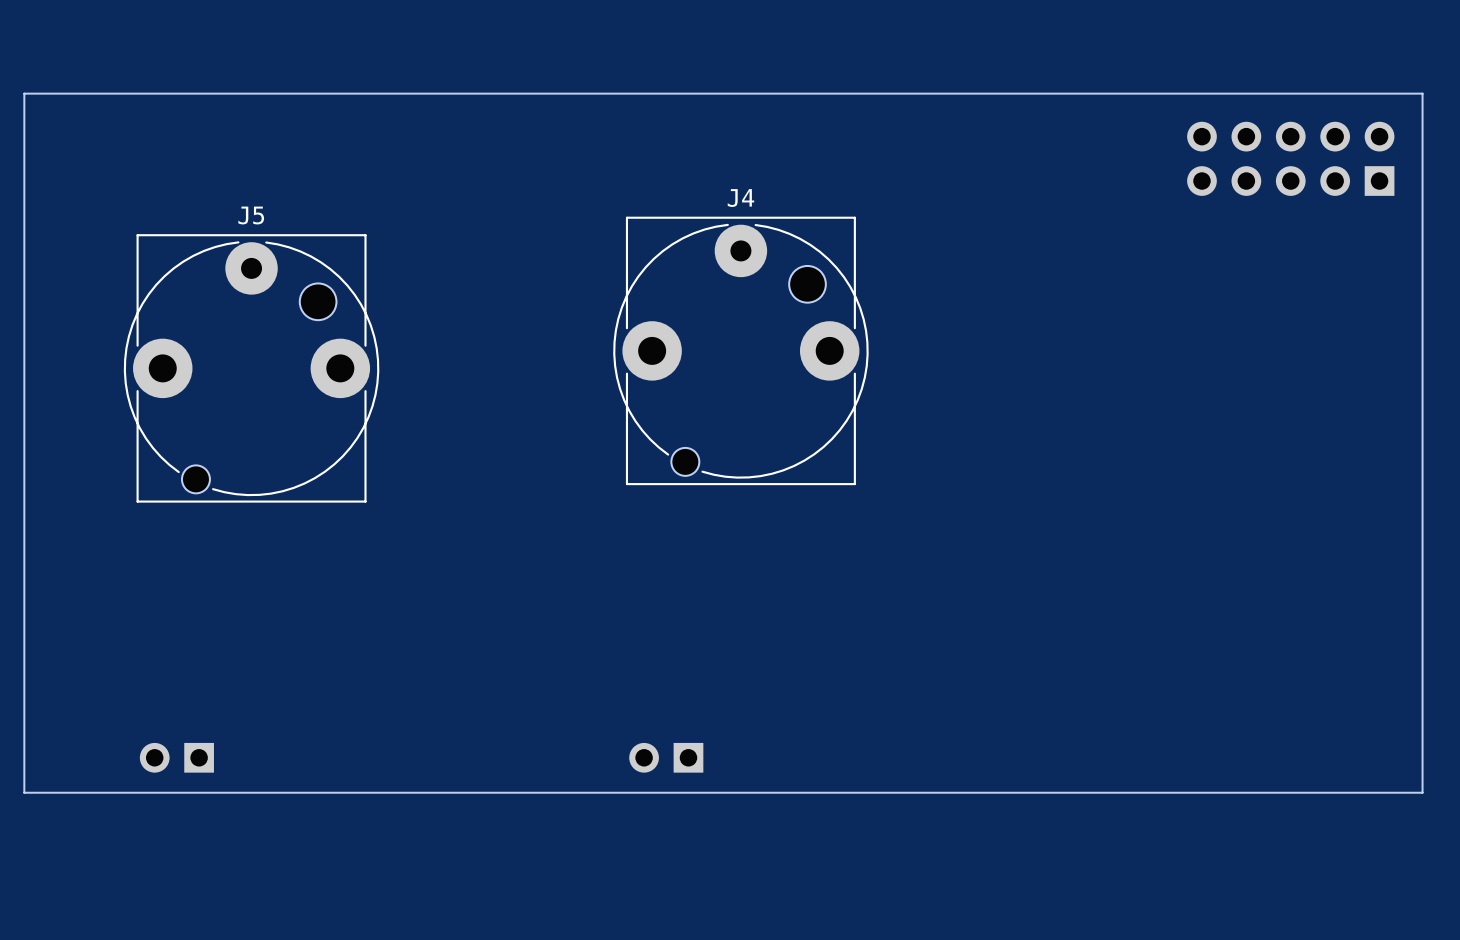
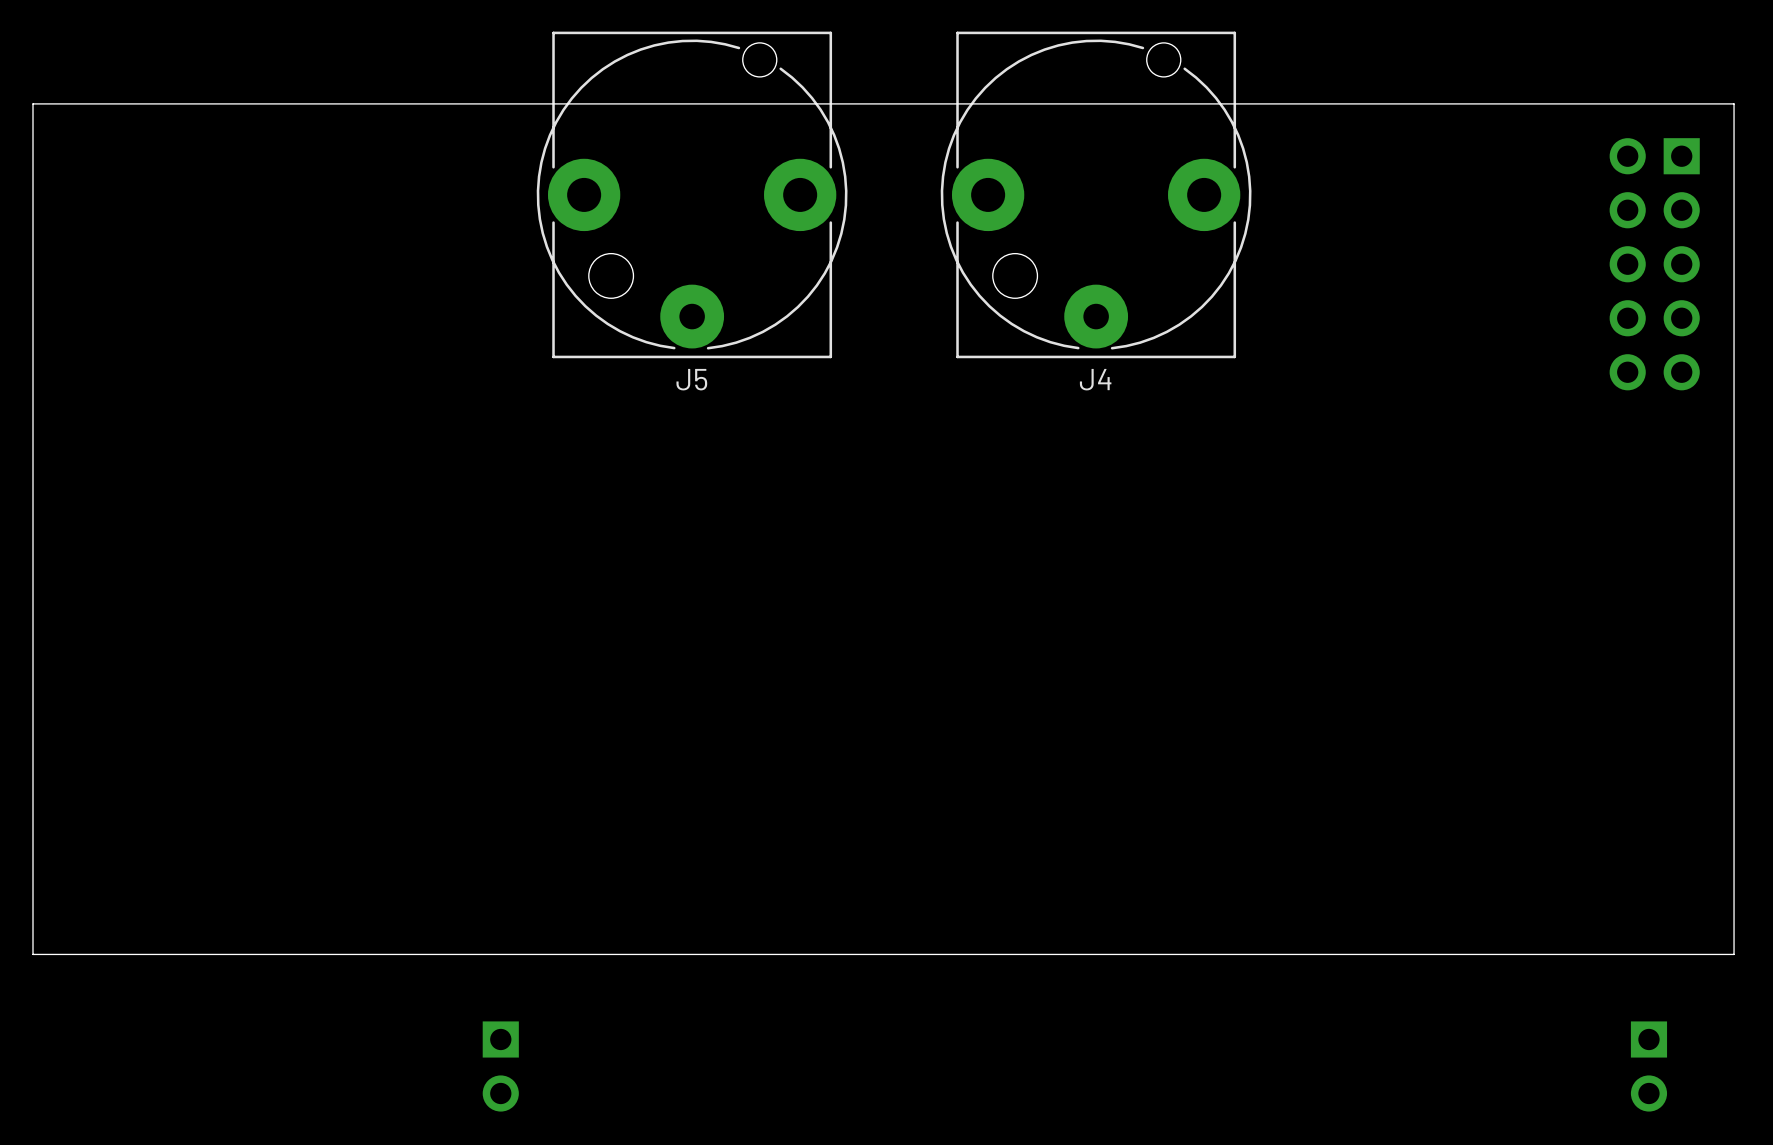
part rotation: 0° (1290, 158) -> 90° counterclockwise (1654, 264)
J4 rotation: 0° (740, 350) -> 180° (1096, 194)
J4 position: (740, 350) -> (1096, 194)
J5 rotation: 0° (251, 368) -> 180° (692, 194)
J5 position: (251, 368) -> (692, 194)
part: (176, 757) -> none
part: (666, 757) -> none
part: none -> (500, 1066)
part: none -> (1648, 1066)

